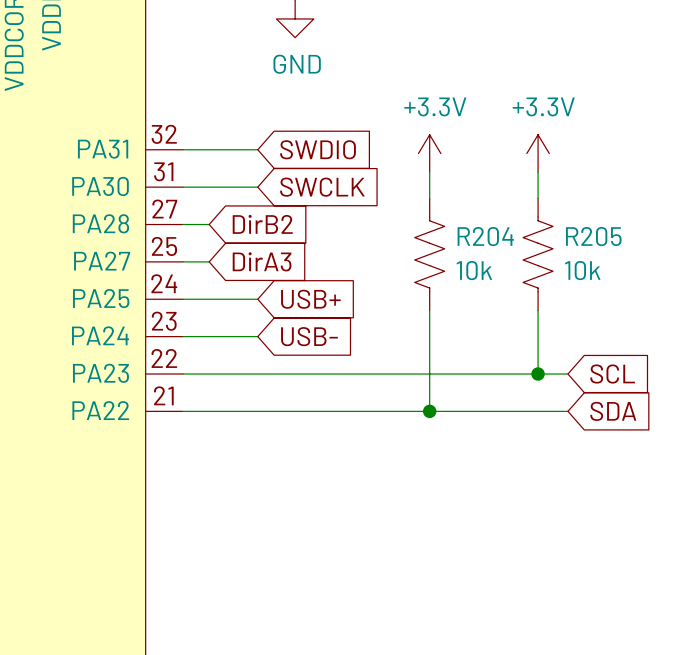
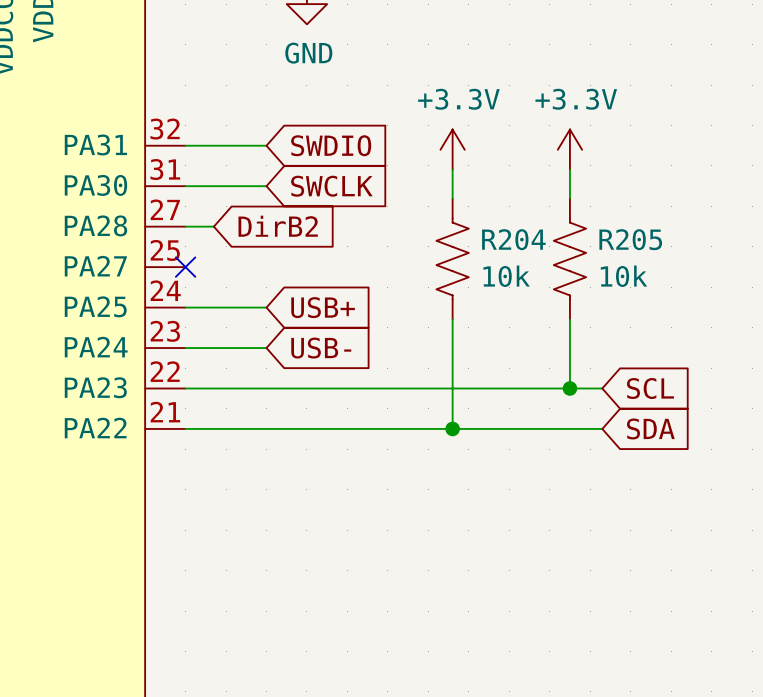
wire: (183, 261) (209, 261) -> none
no-connect mark: none -> (185, 267)
global label: DirA3 (262, 261) -> none

